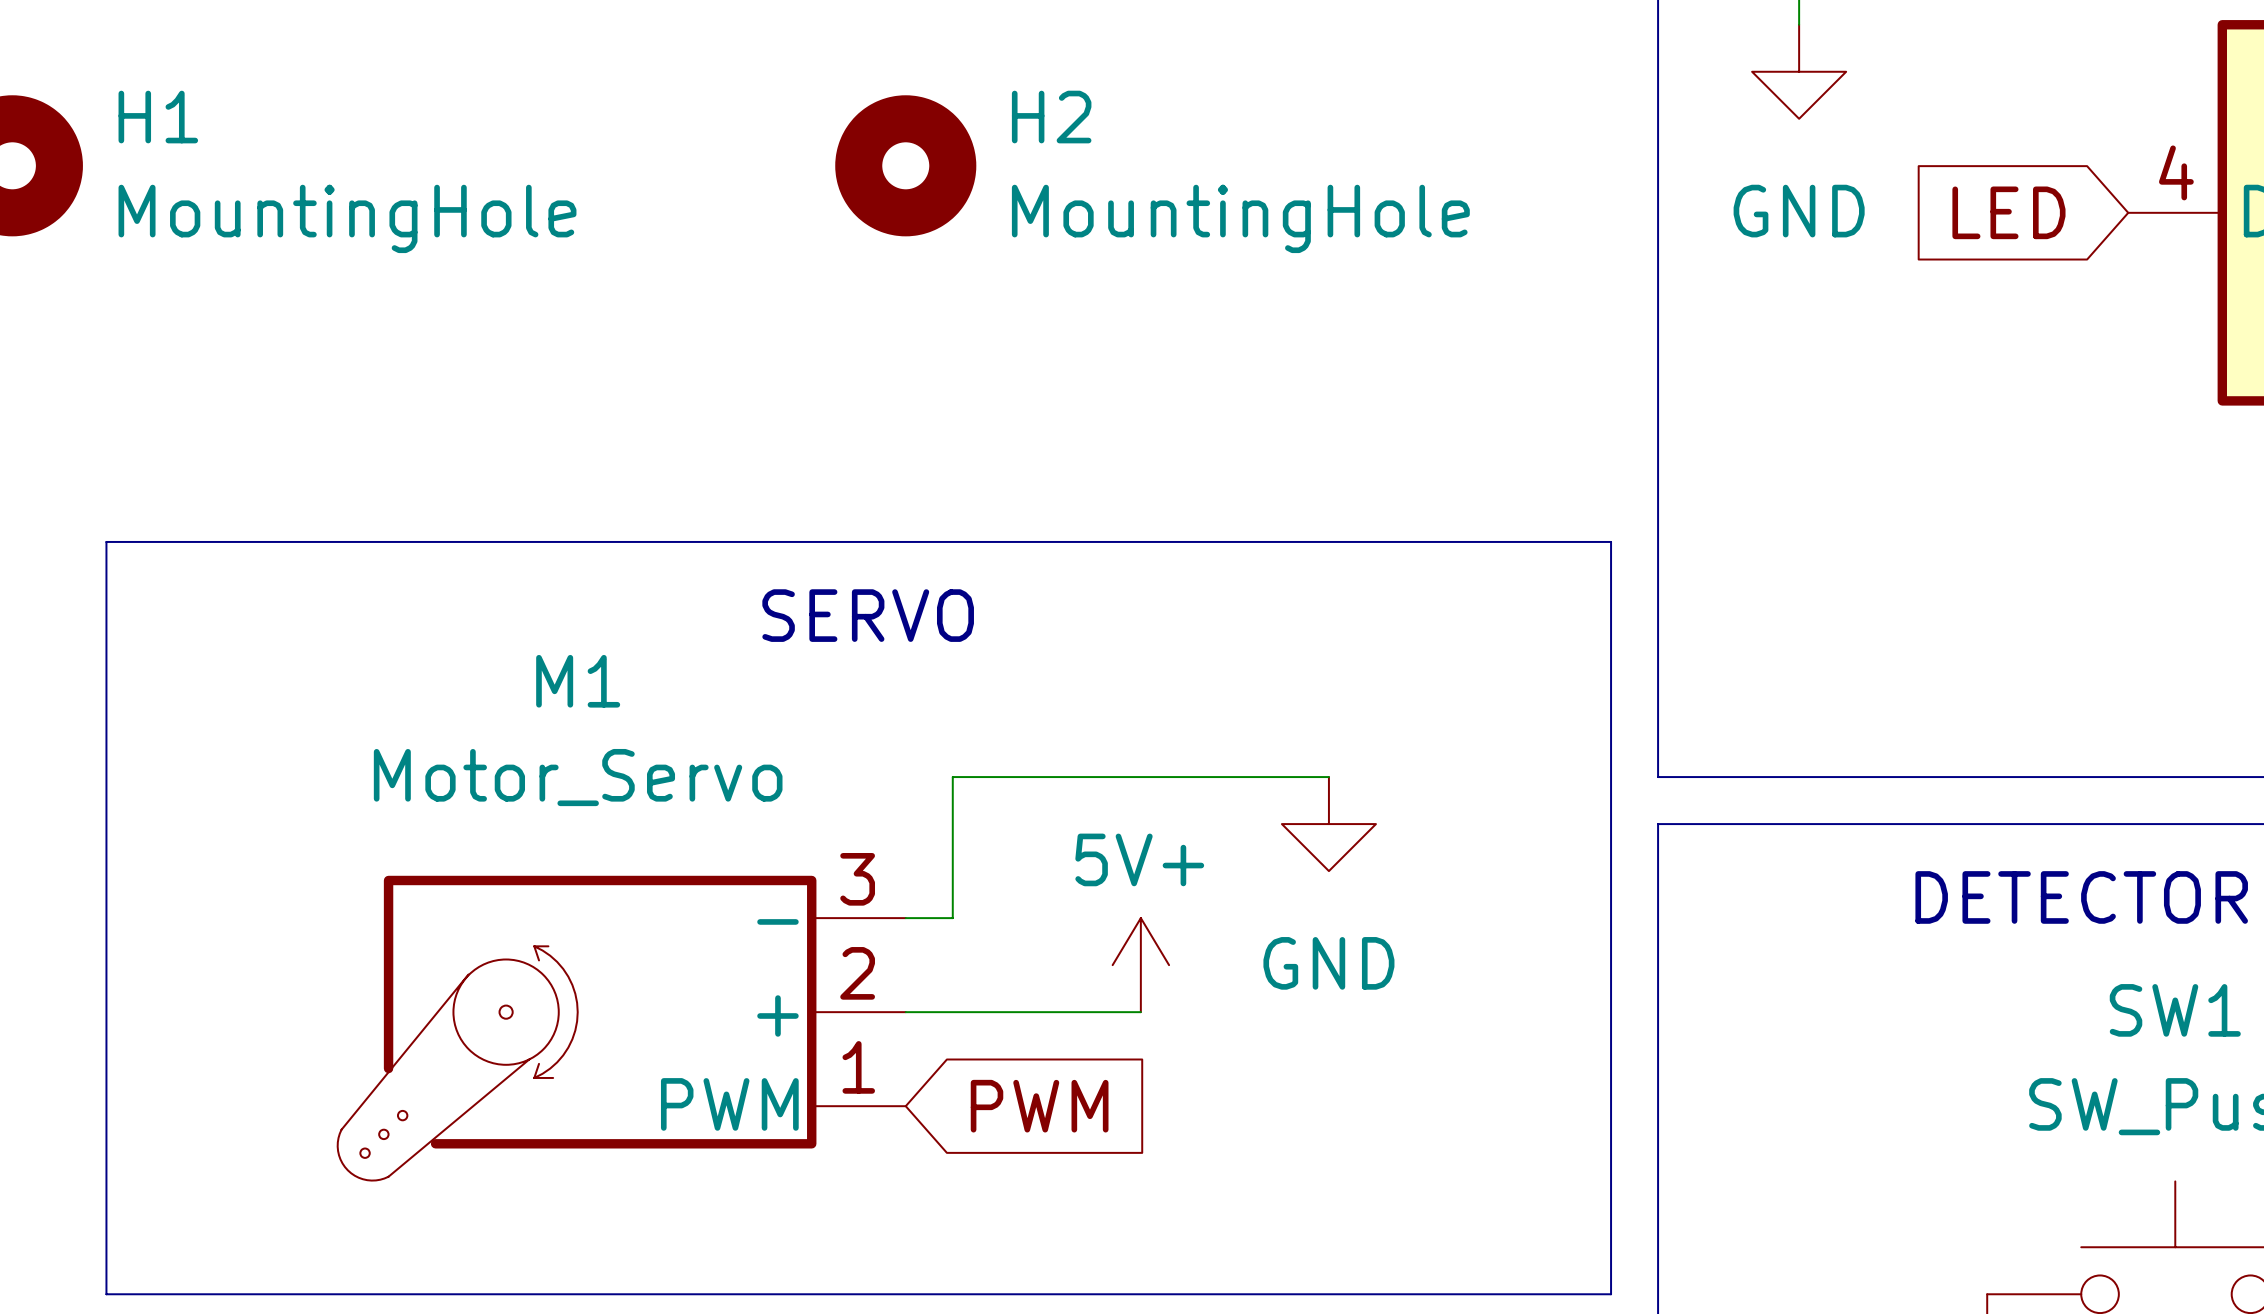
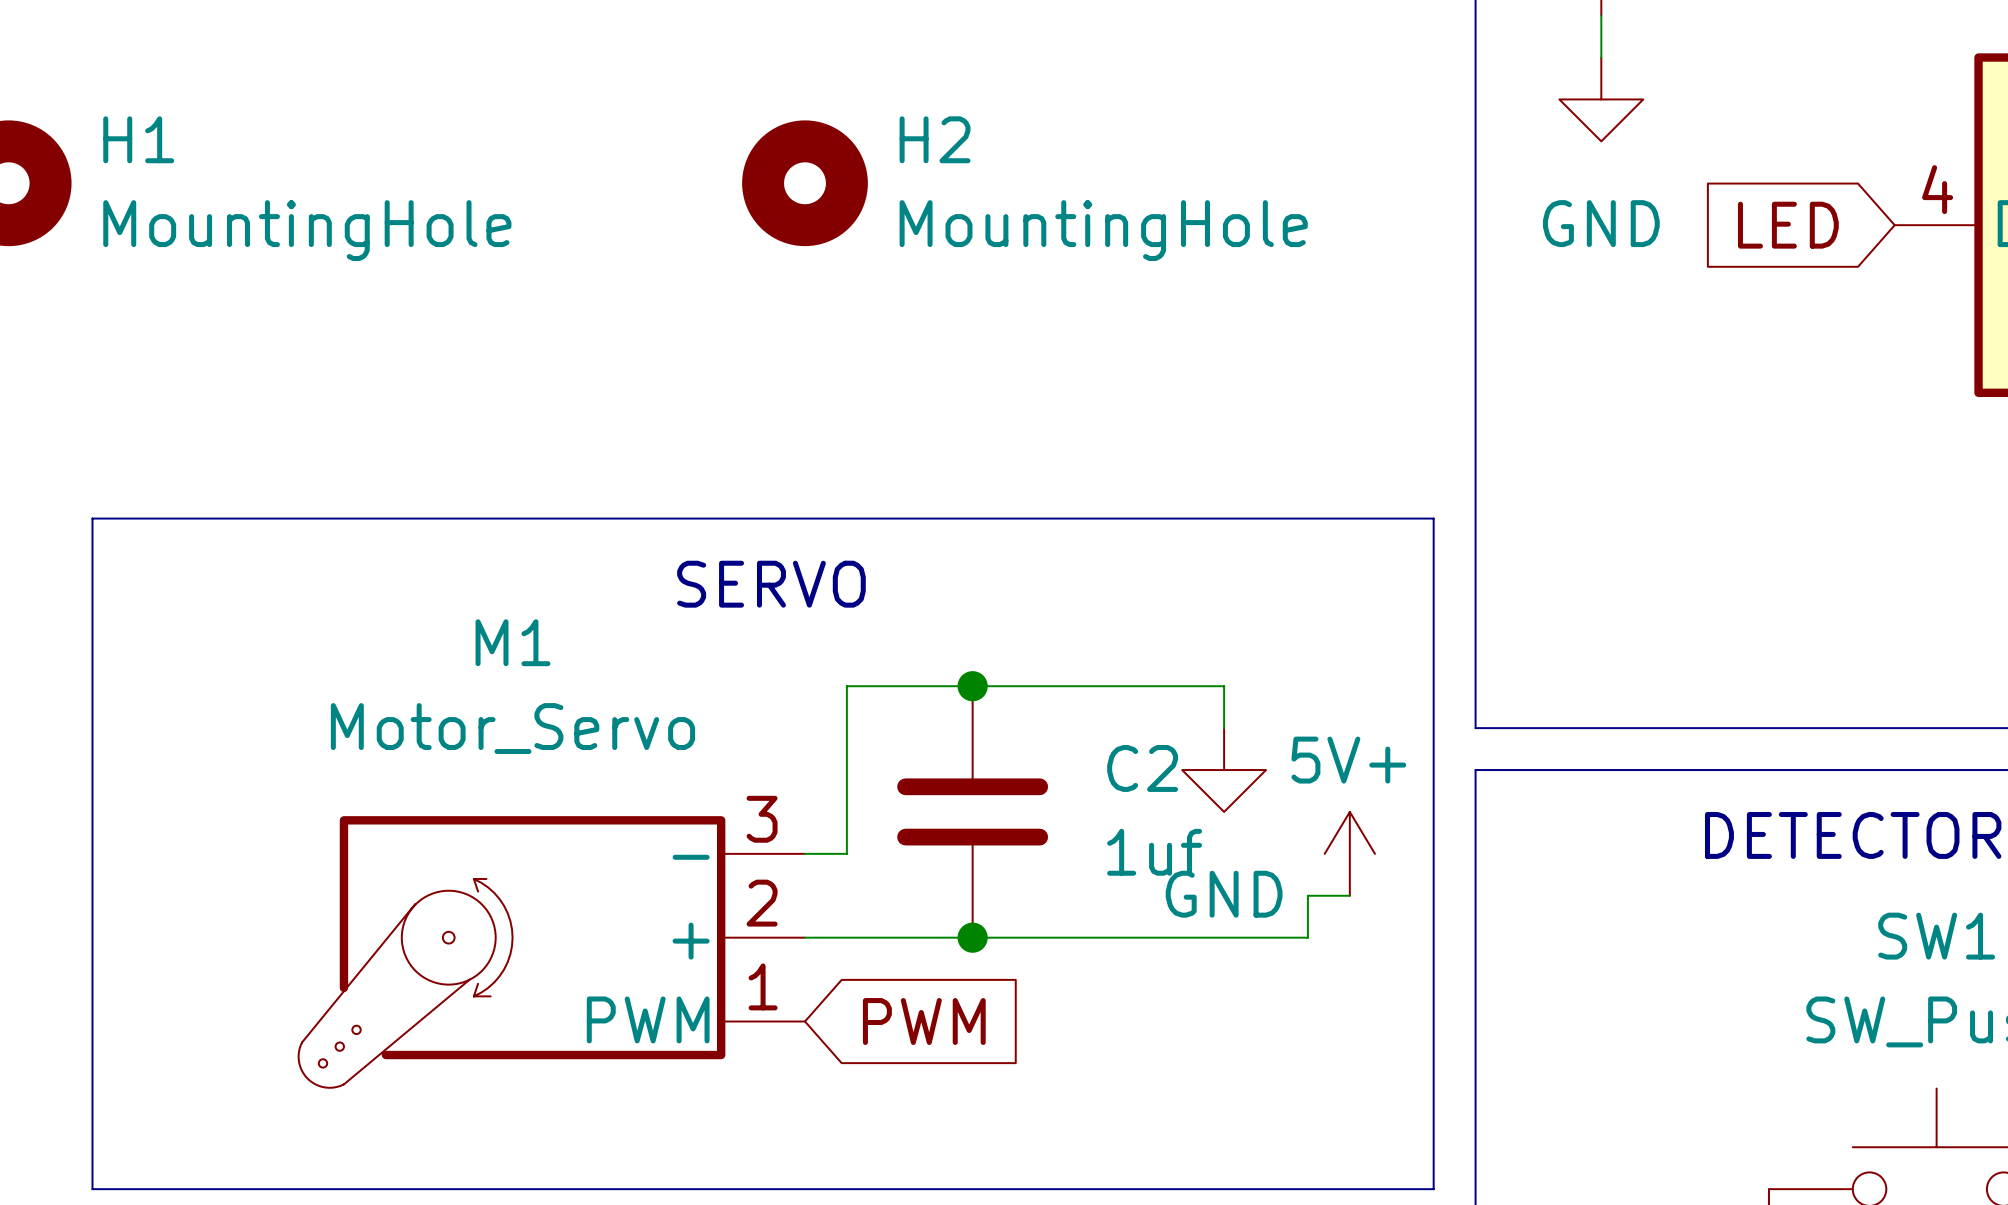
junction: none -> (972, 686)
wire: (952, 777) (1328, 777) -> (846, 728) (846, 686) (1224, 686) (1224, 728)
power symbol position: GND (1328, 824) -> GND (1224, 770)
C2: none -> 1uf (972, 811)
power symbol position: 5V+ (1140, 965) -> 5V+ (1349, 853)
wire: none -> (1349, 895) (1307, 895) (1307, 937) (1014, 937)
junction: none -> (972, 937)

